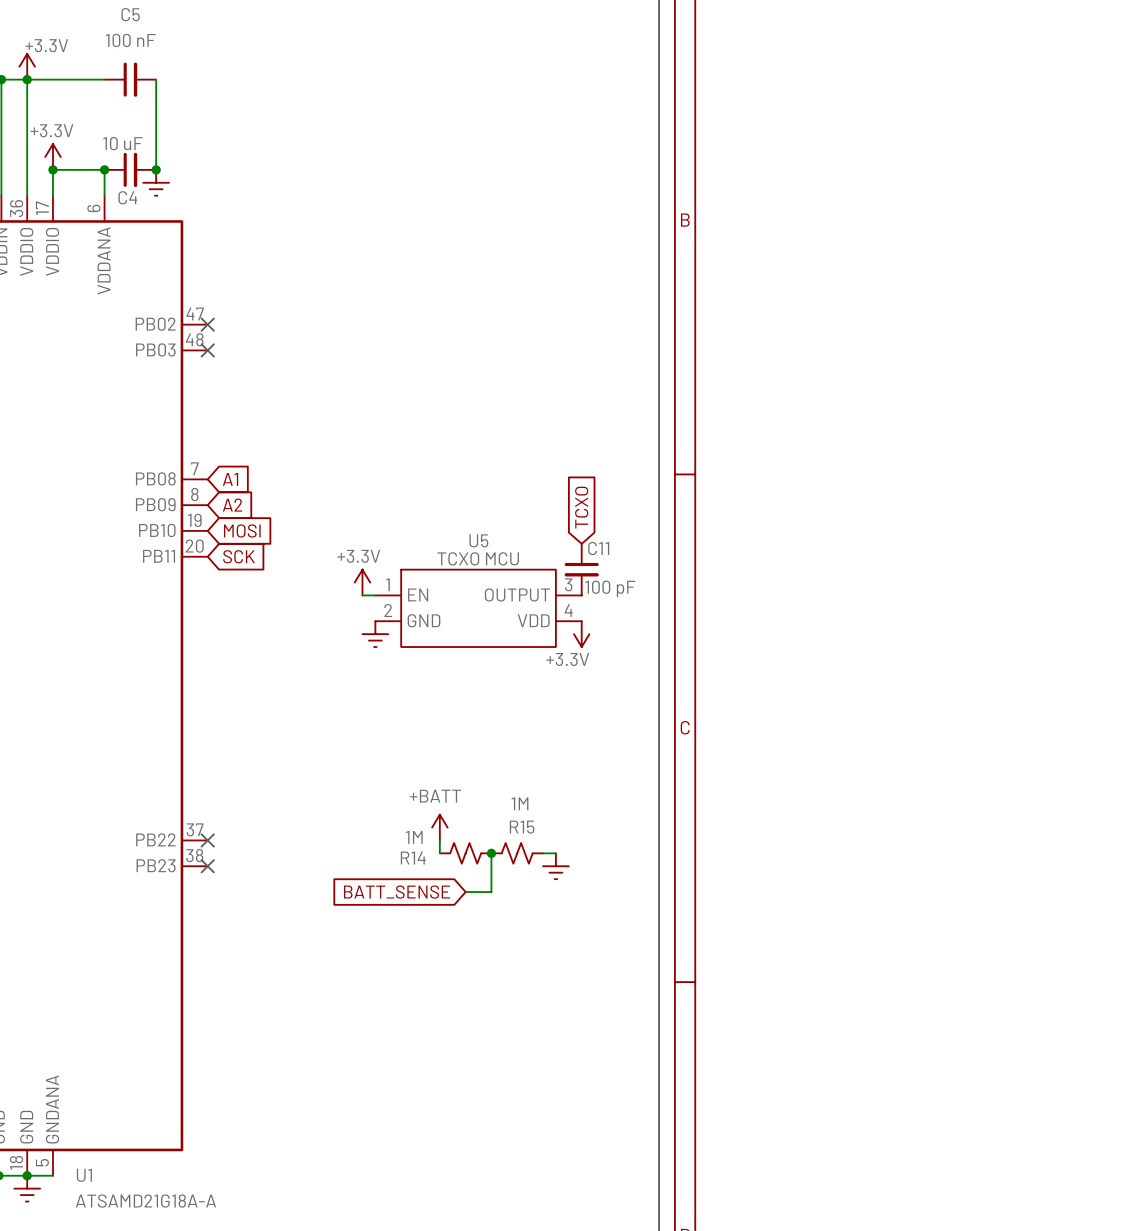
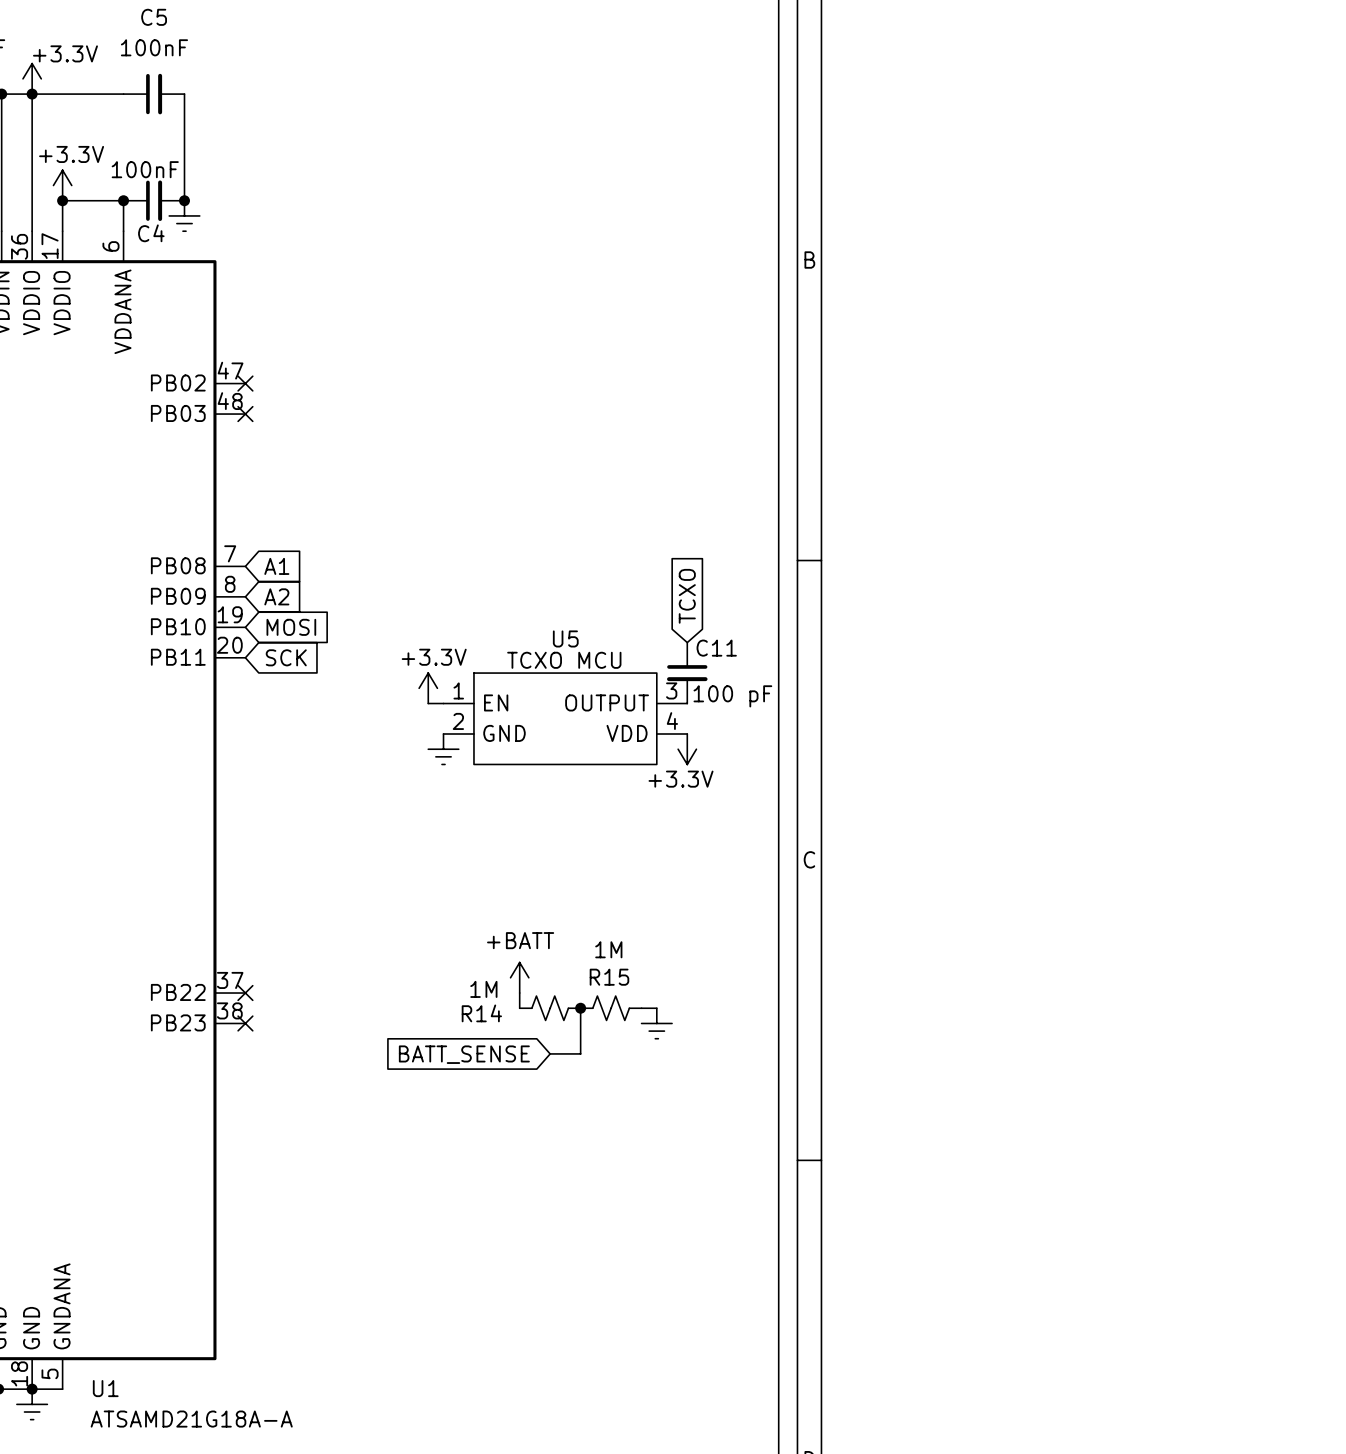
C5 value: 100 nF (130, 40) -> 100nF (154, 47)
C4 value: 10 uF (122, 143) -> 100nF (145, 169)

